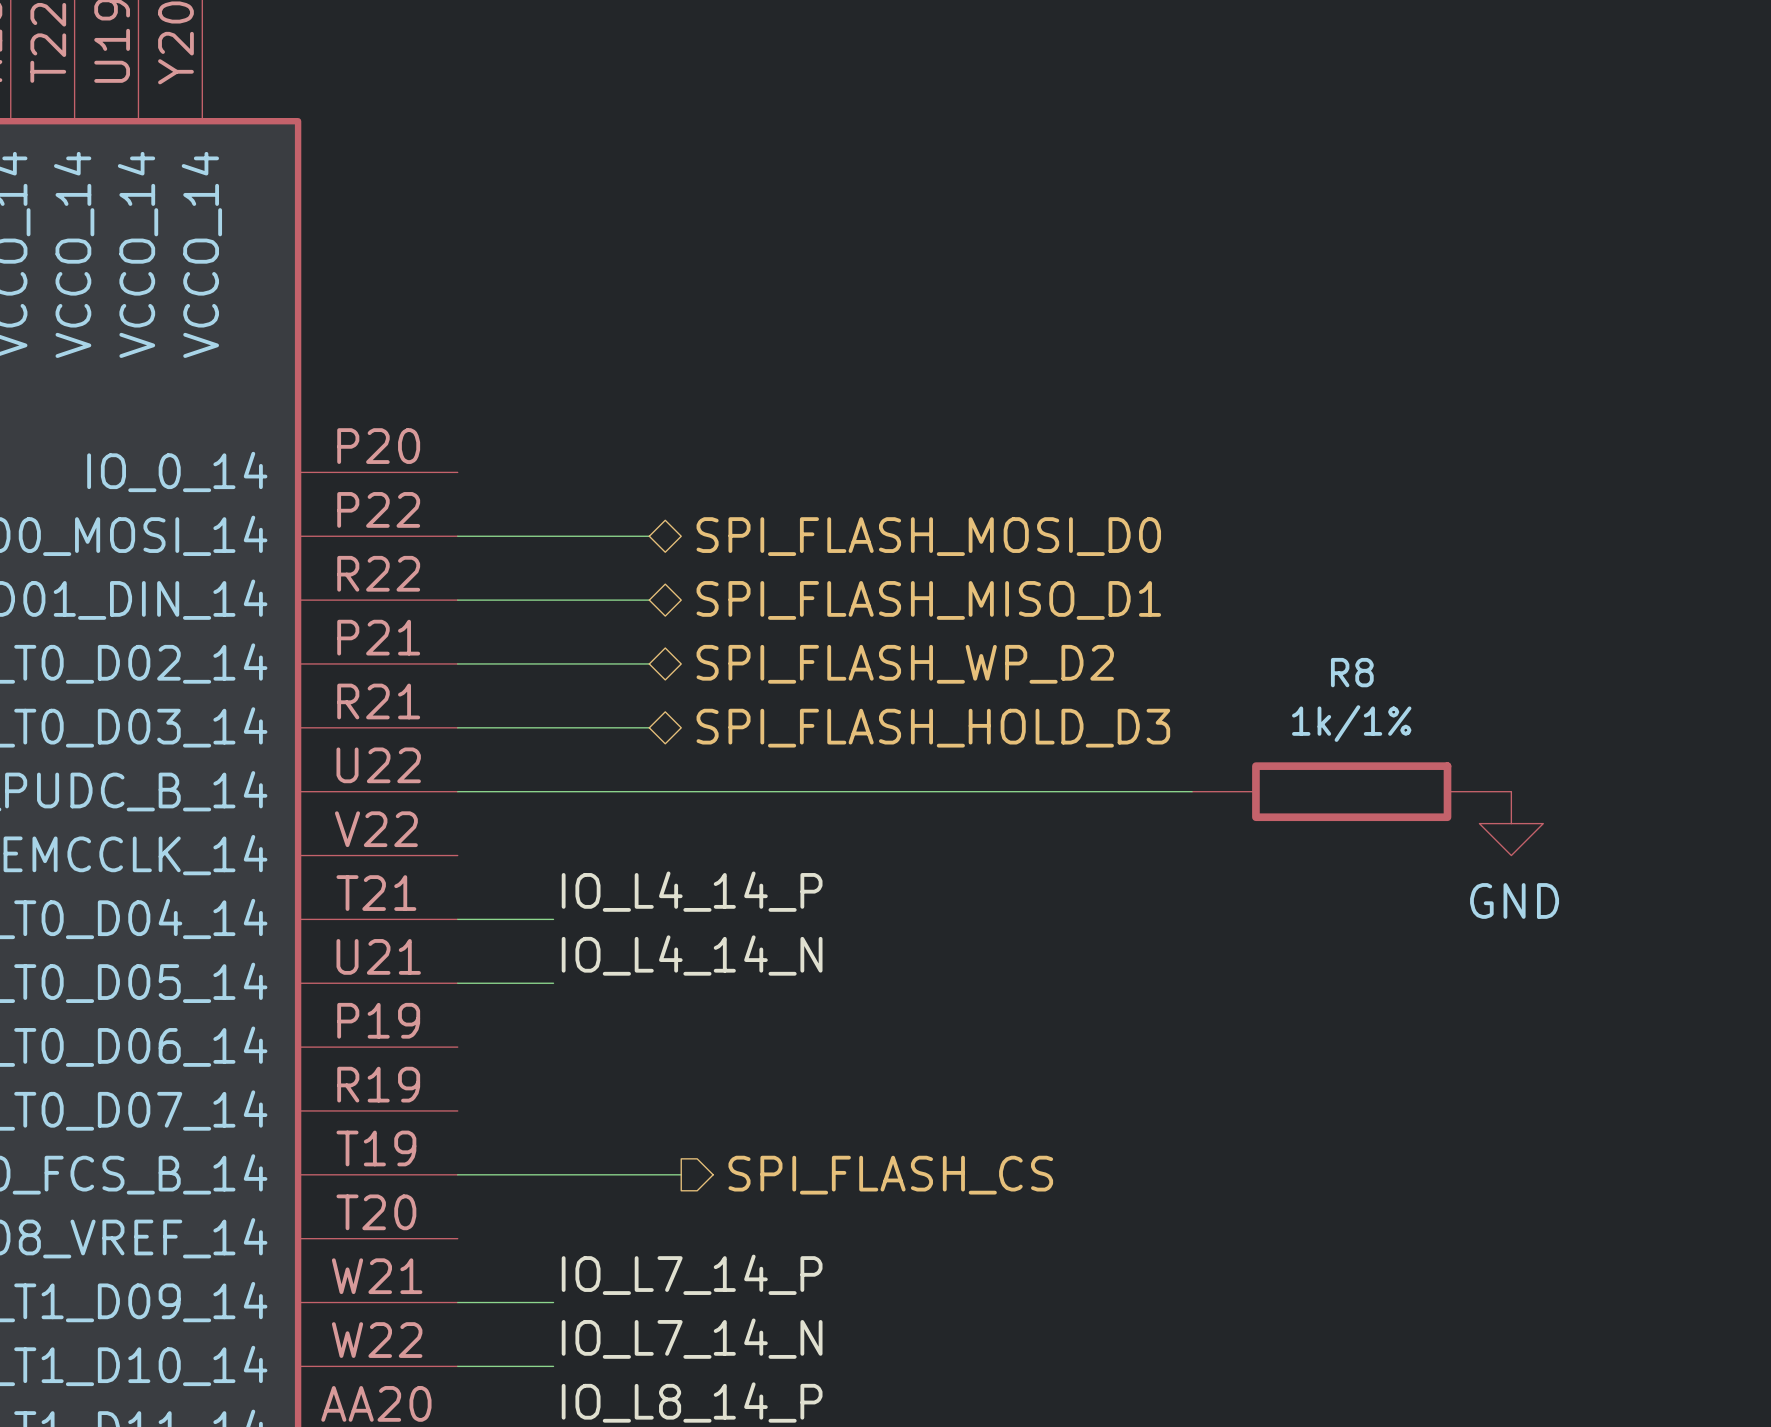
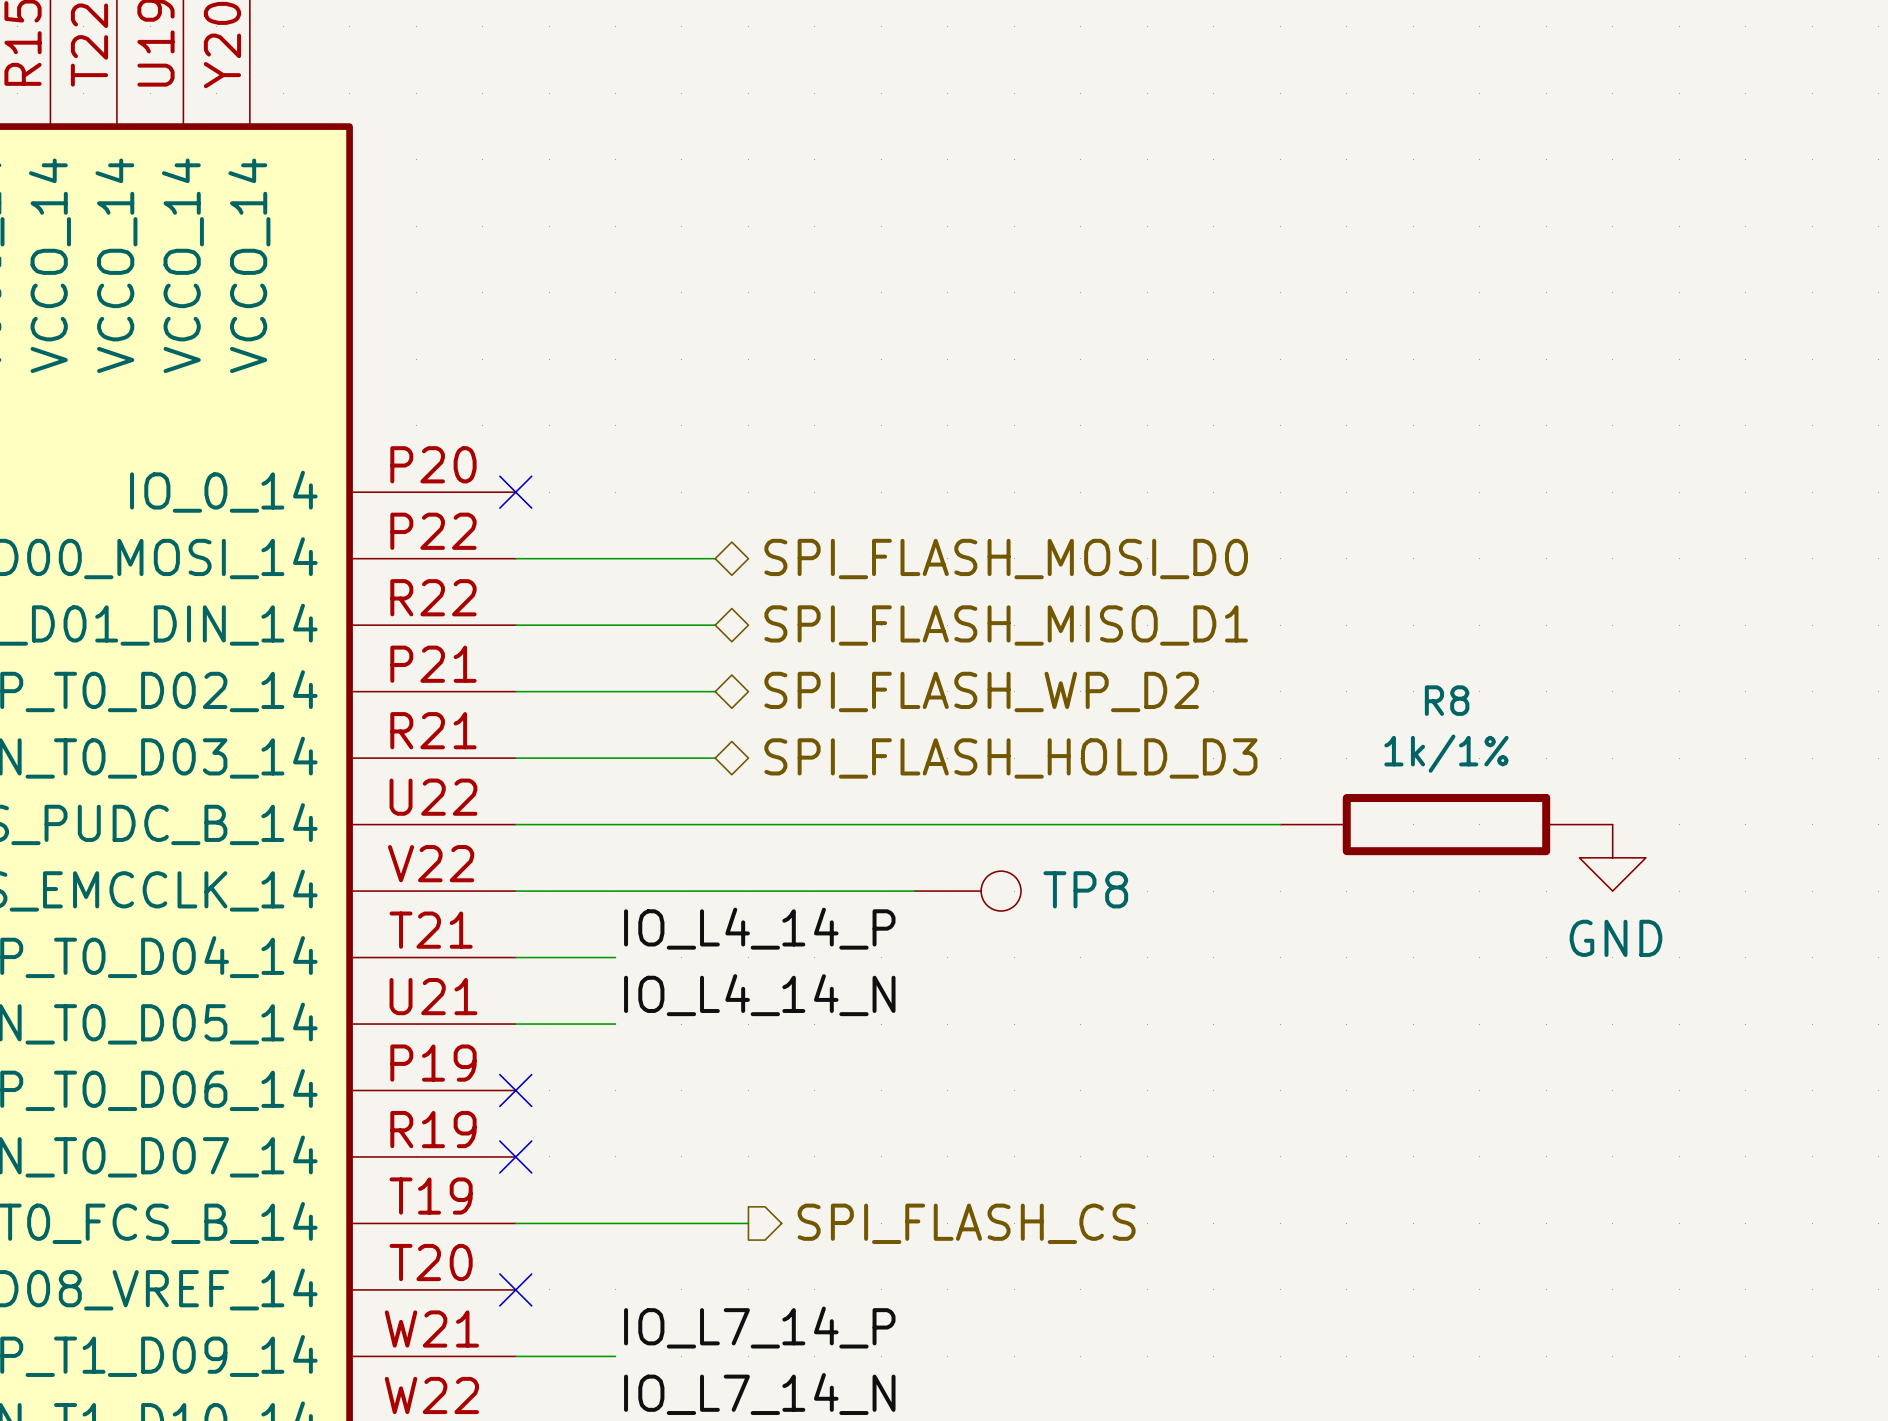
no-connect mark: none -> (515, 492)
wire: none -> (515, 891) (914, 891)
TP8: none -> (967, 891)
no-connect mark: none -> (515, 1090)
no-connect mark: none -> (515, 1156)
no-connect mark: none -> (515, 1289)

